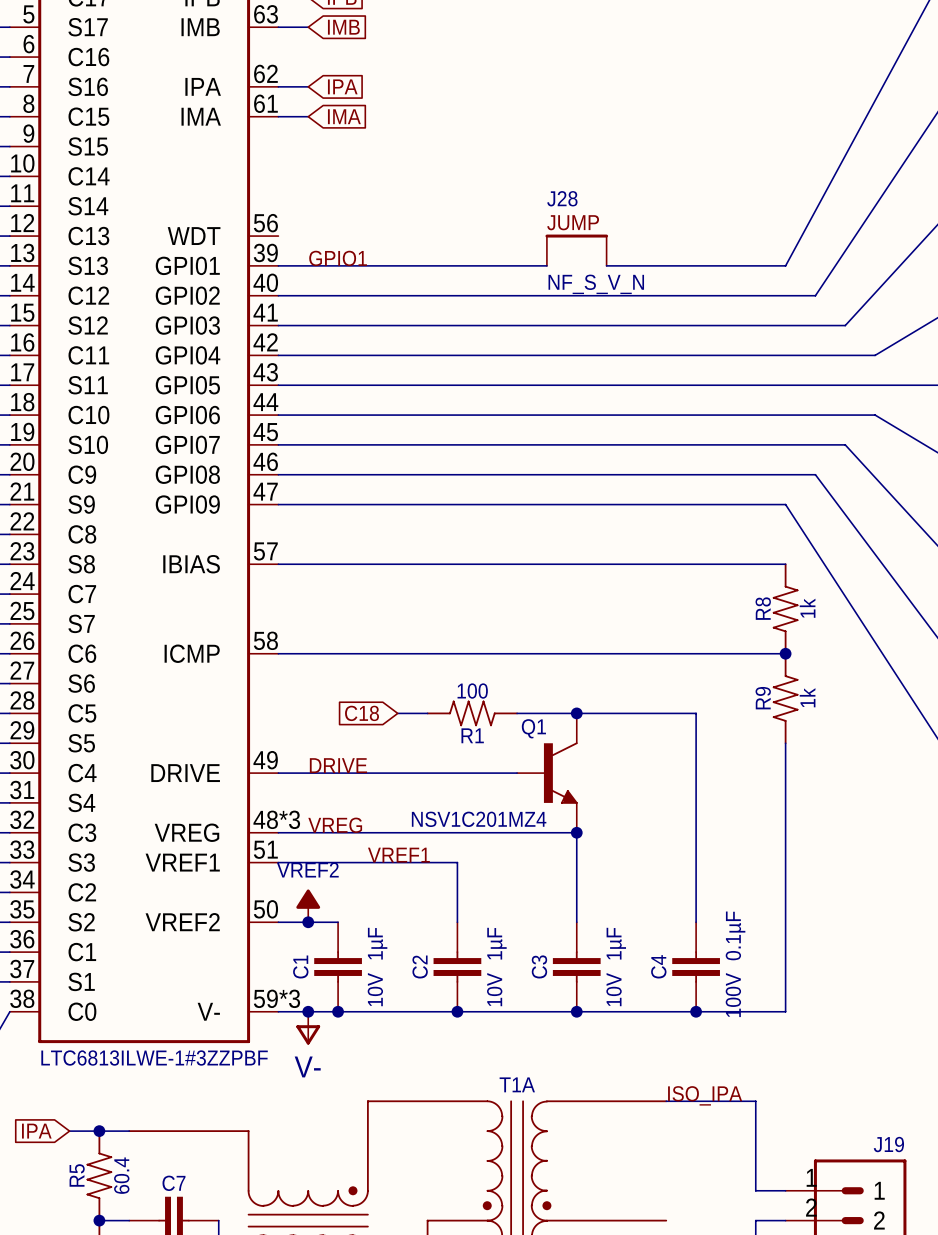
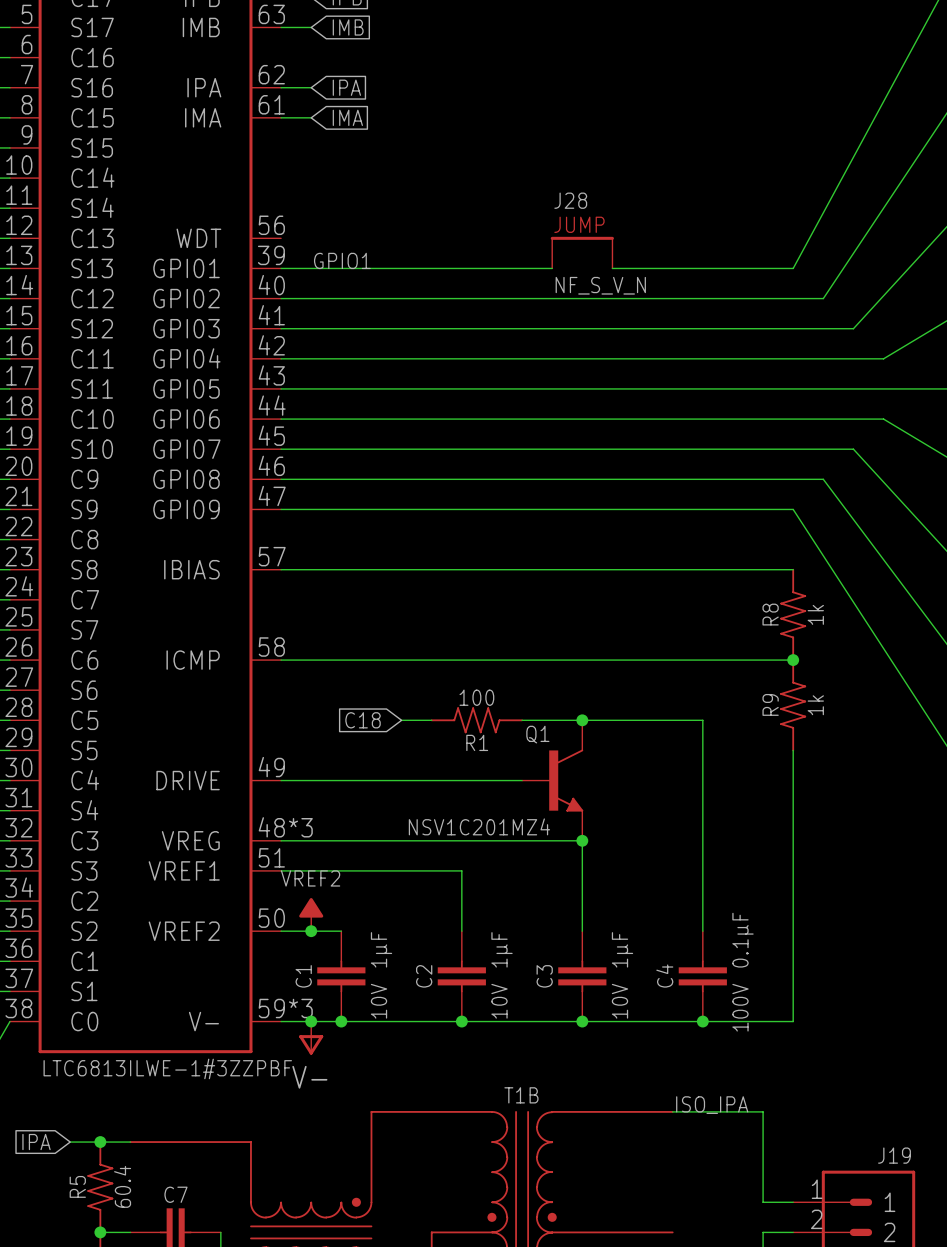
label: DRIVE (338, 765) -> none
label: VREG (335, 825) -> none
label: VREF1 (398, 855) -> none
T1A name: T1A (517, 1084) -> T1B (521, 1095)

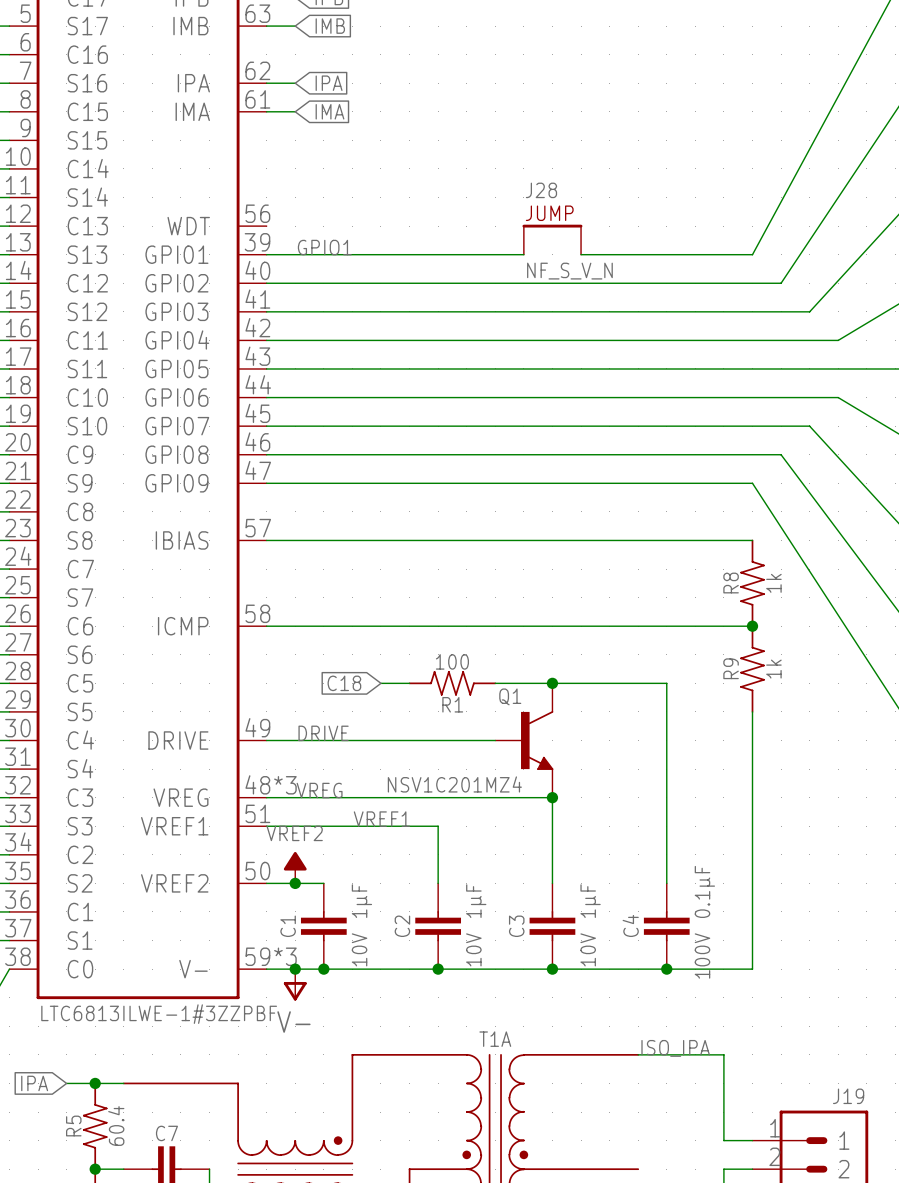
label: none -> DRIVE (323, 733)
label: none -> VREG (319, 790)
label: none -> VREF1 (381, 819)
T1B name: T1B (521, 1095) -> T1A (495, 1039)

